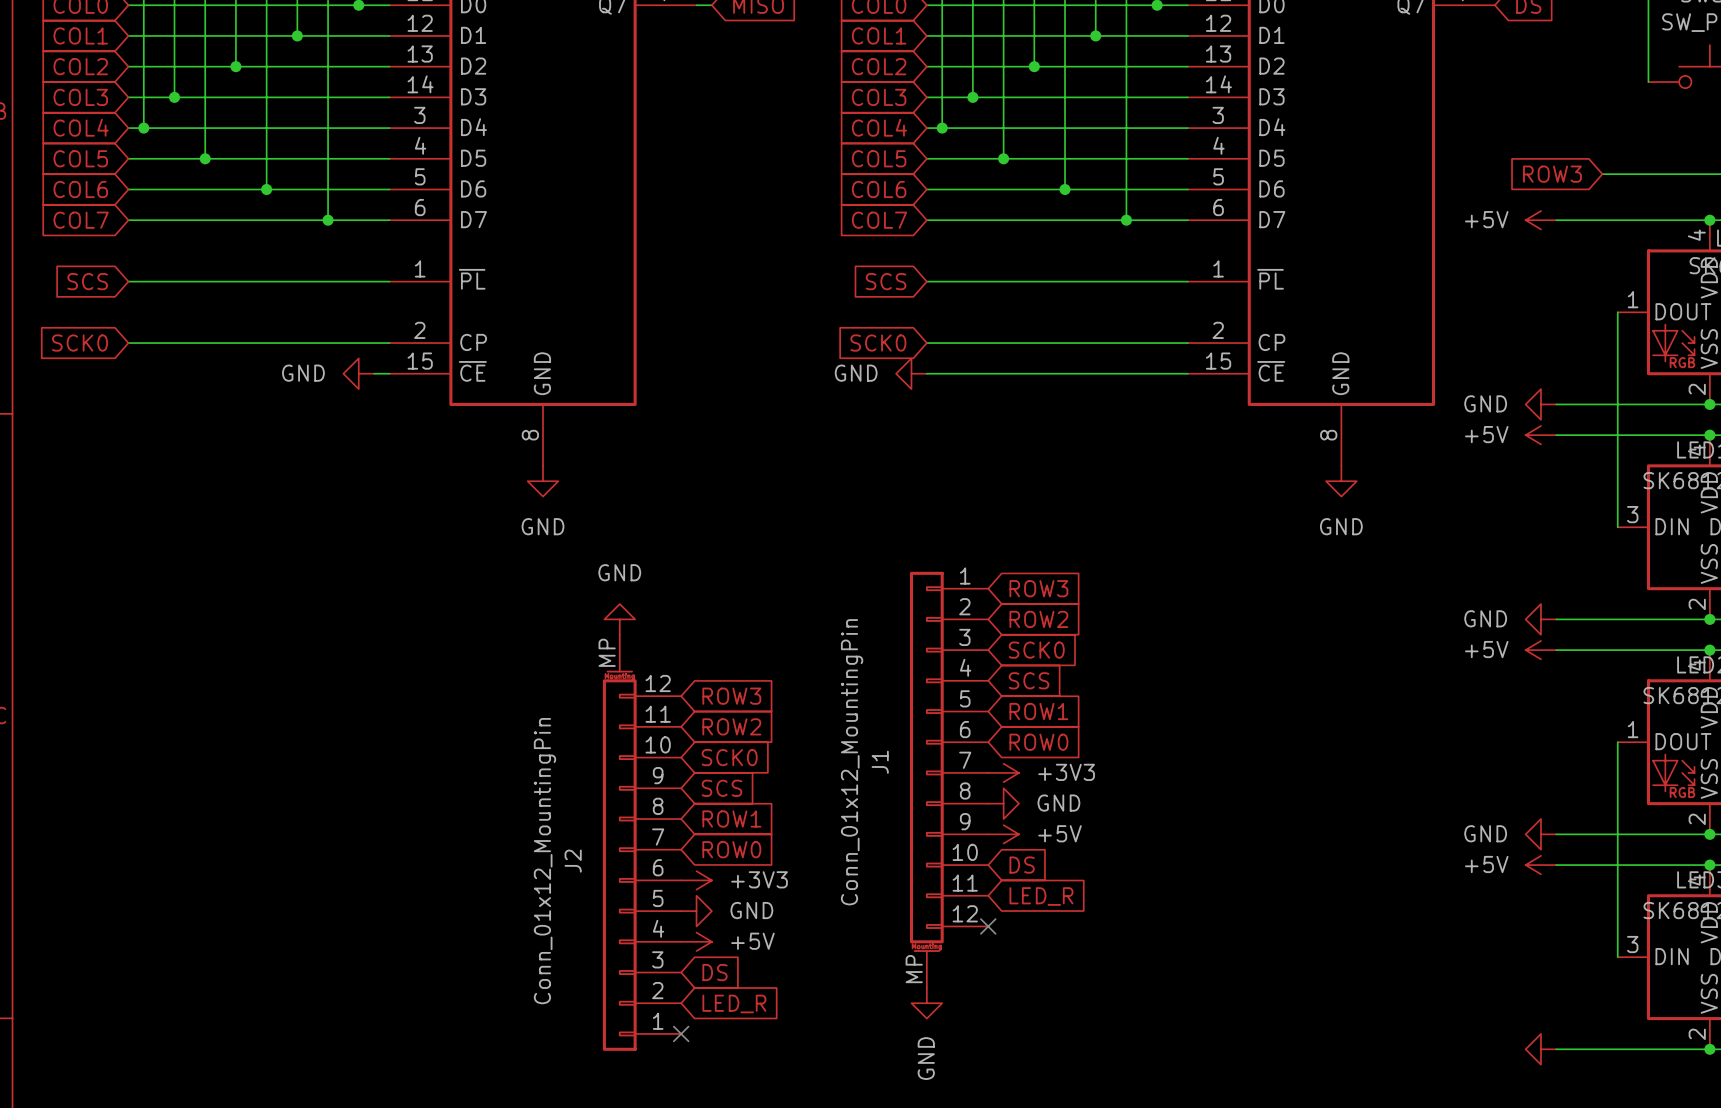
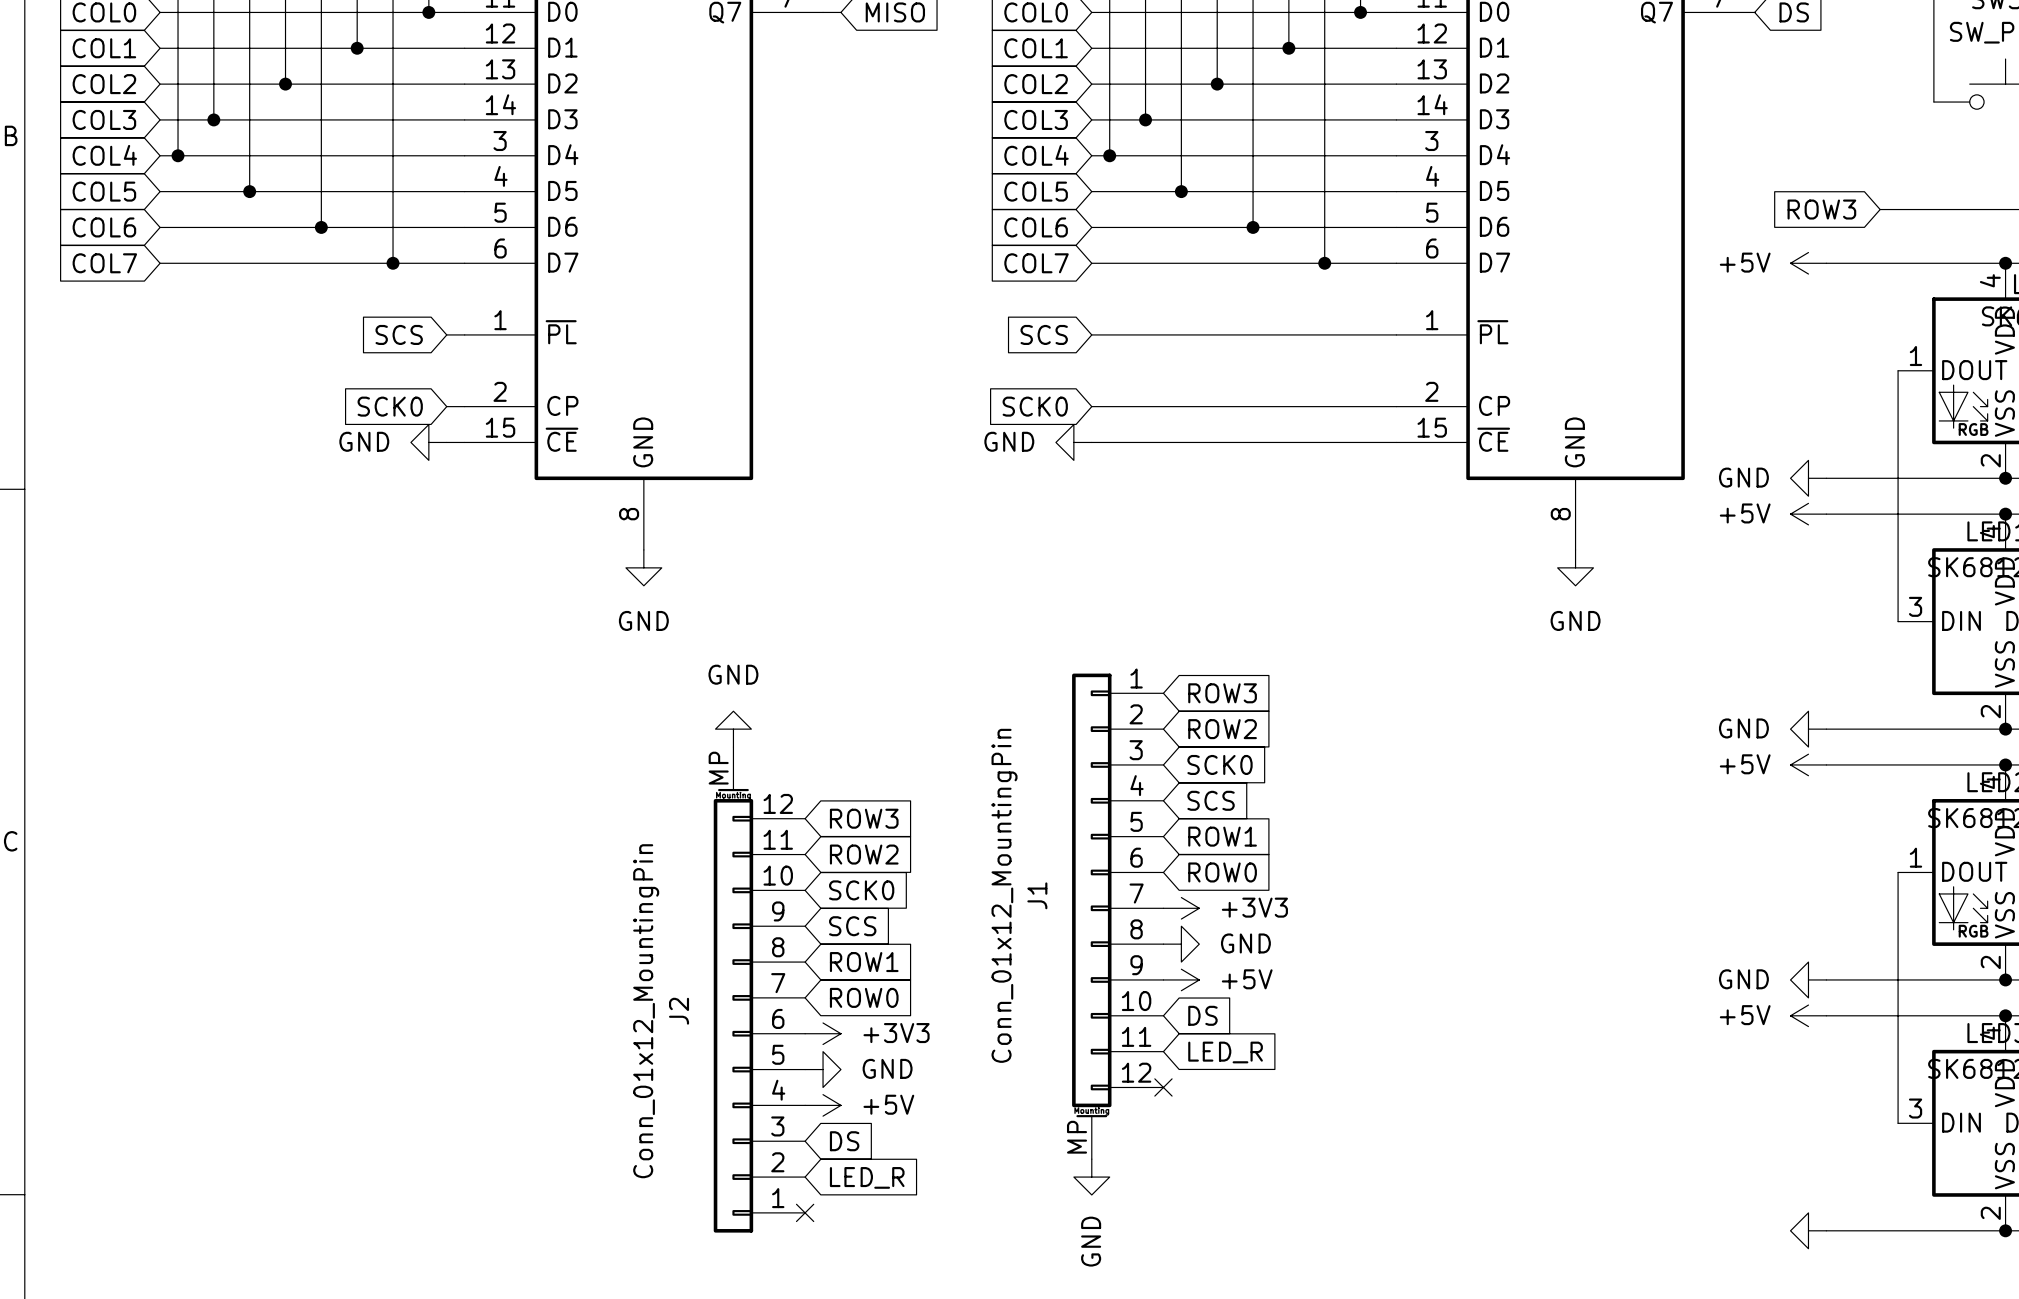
global label position: SCS (87, 281) -> SCS (399, 334)
wire: (128, 281) (374, 281) -> none
global label position: SCK0 (80, 343) -> SCK0 (390, 406)
wire: (128, 343) (374, 343) -> none

